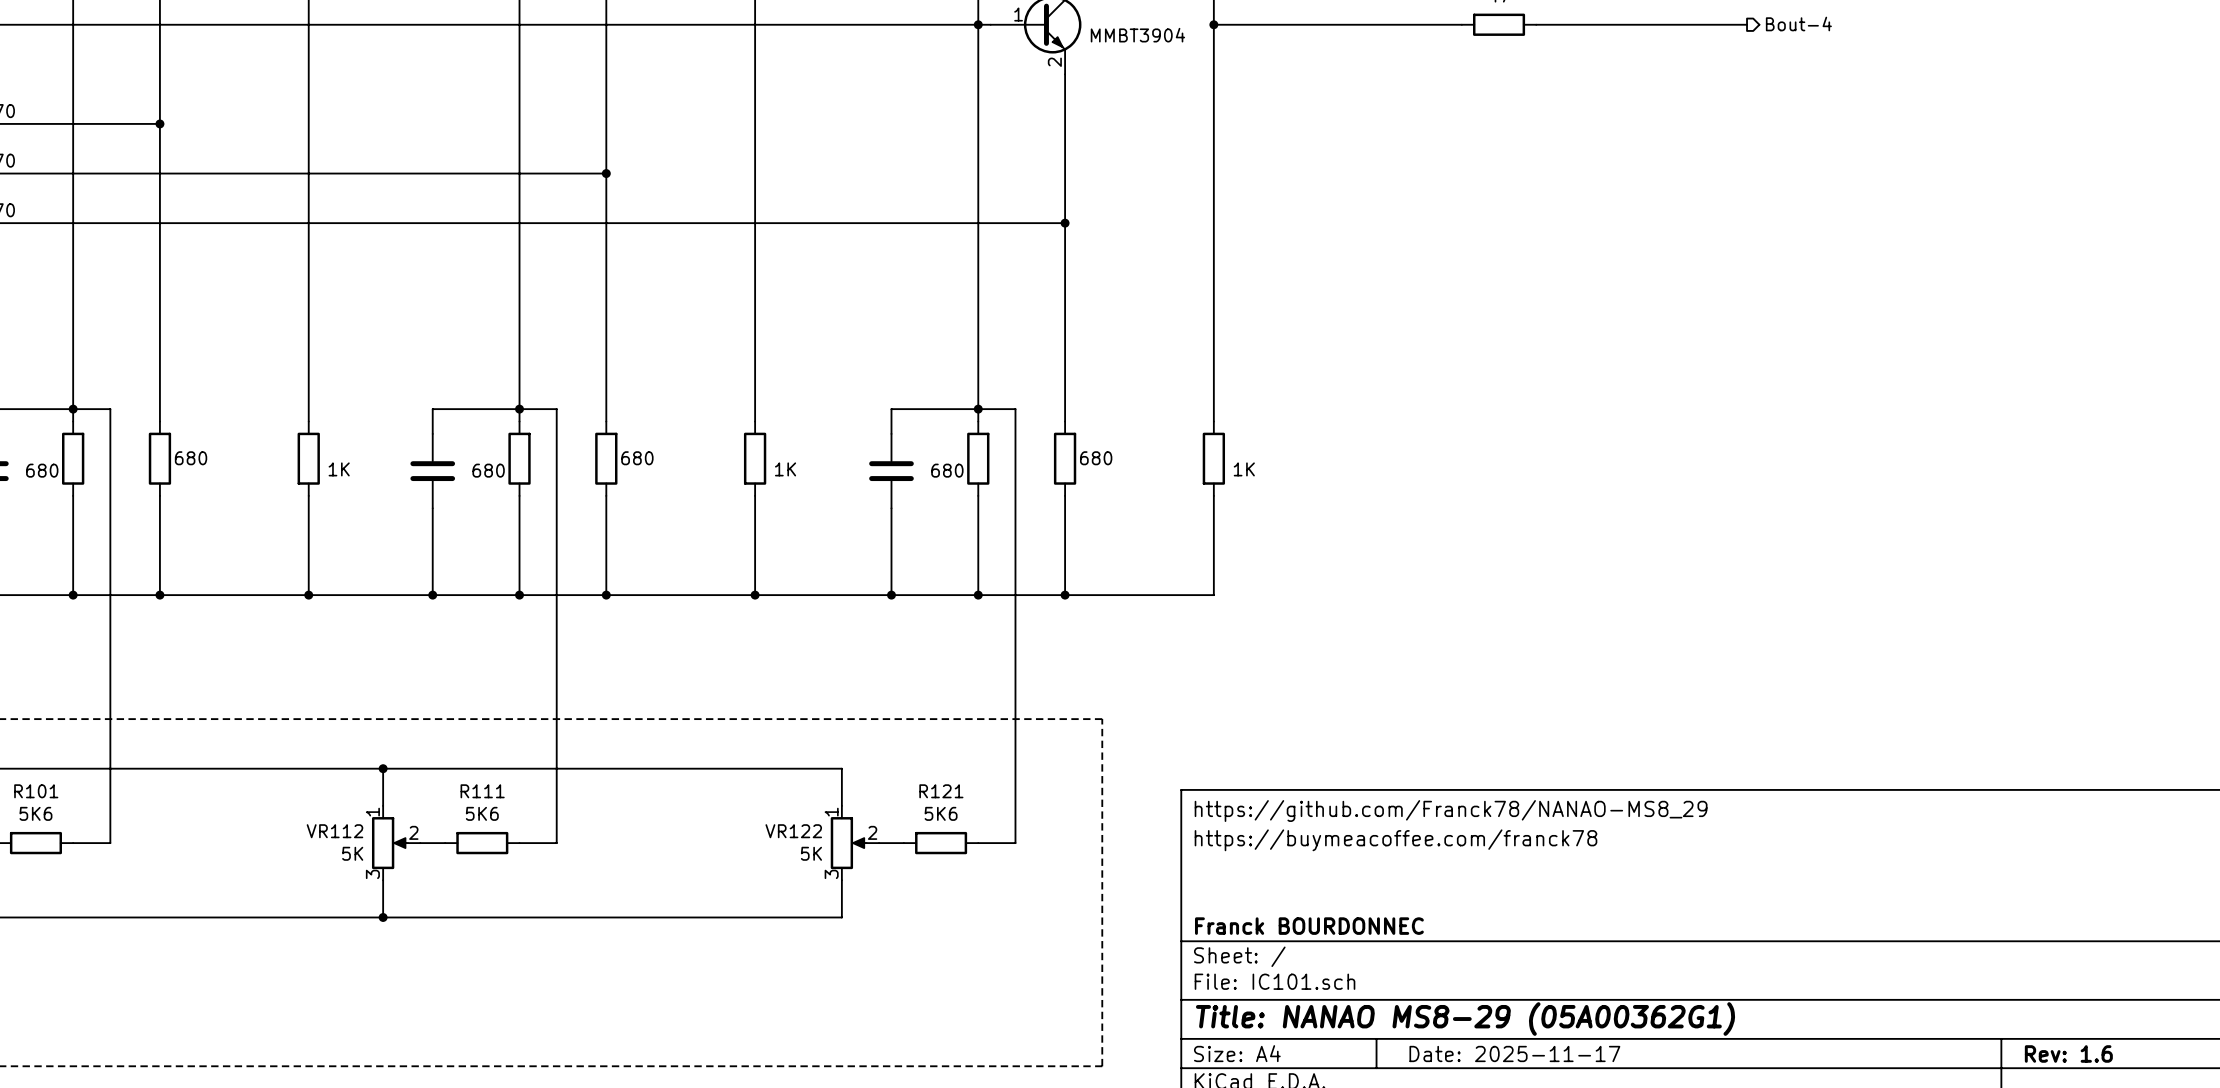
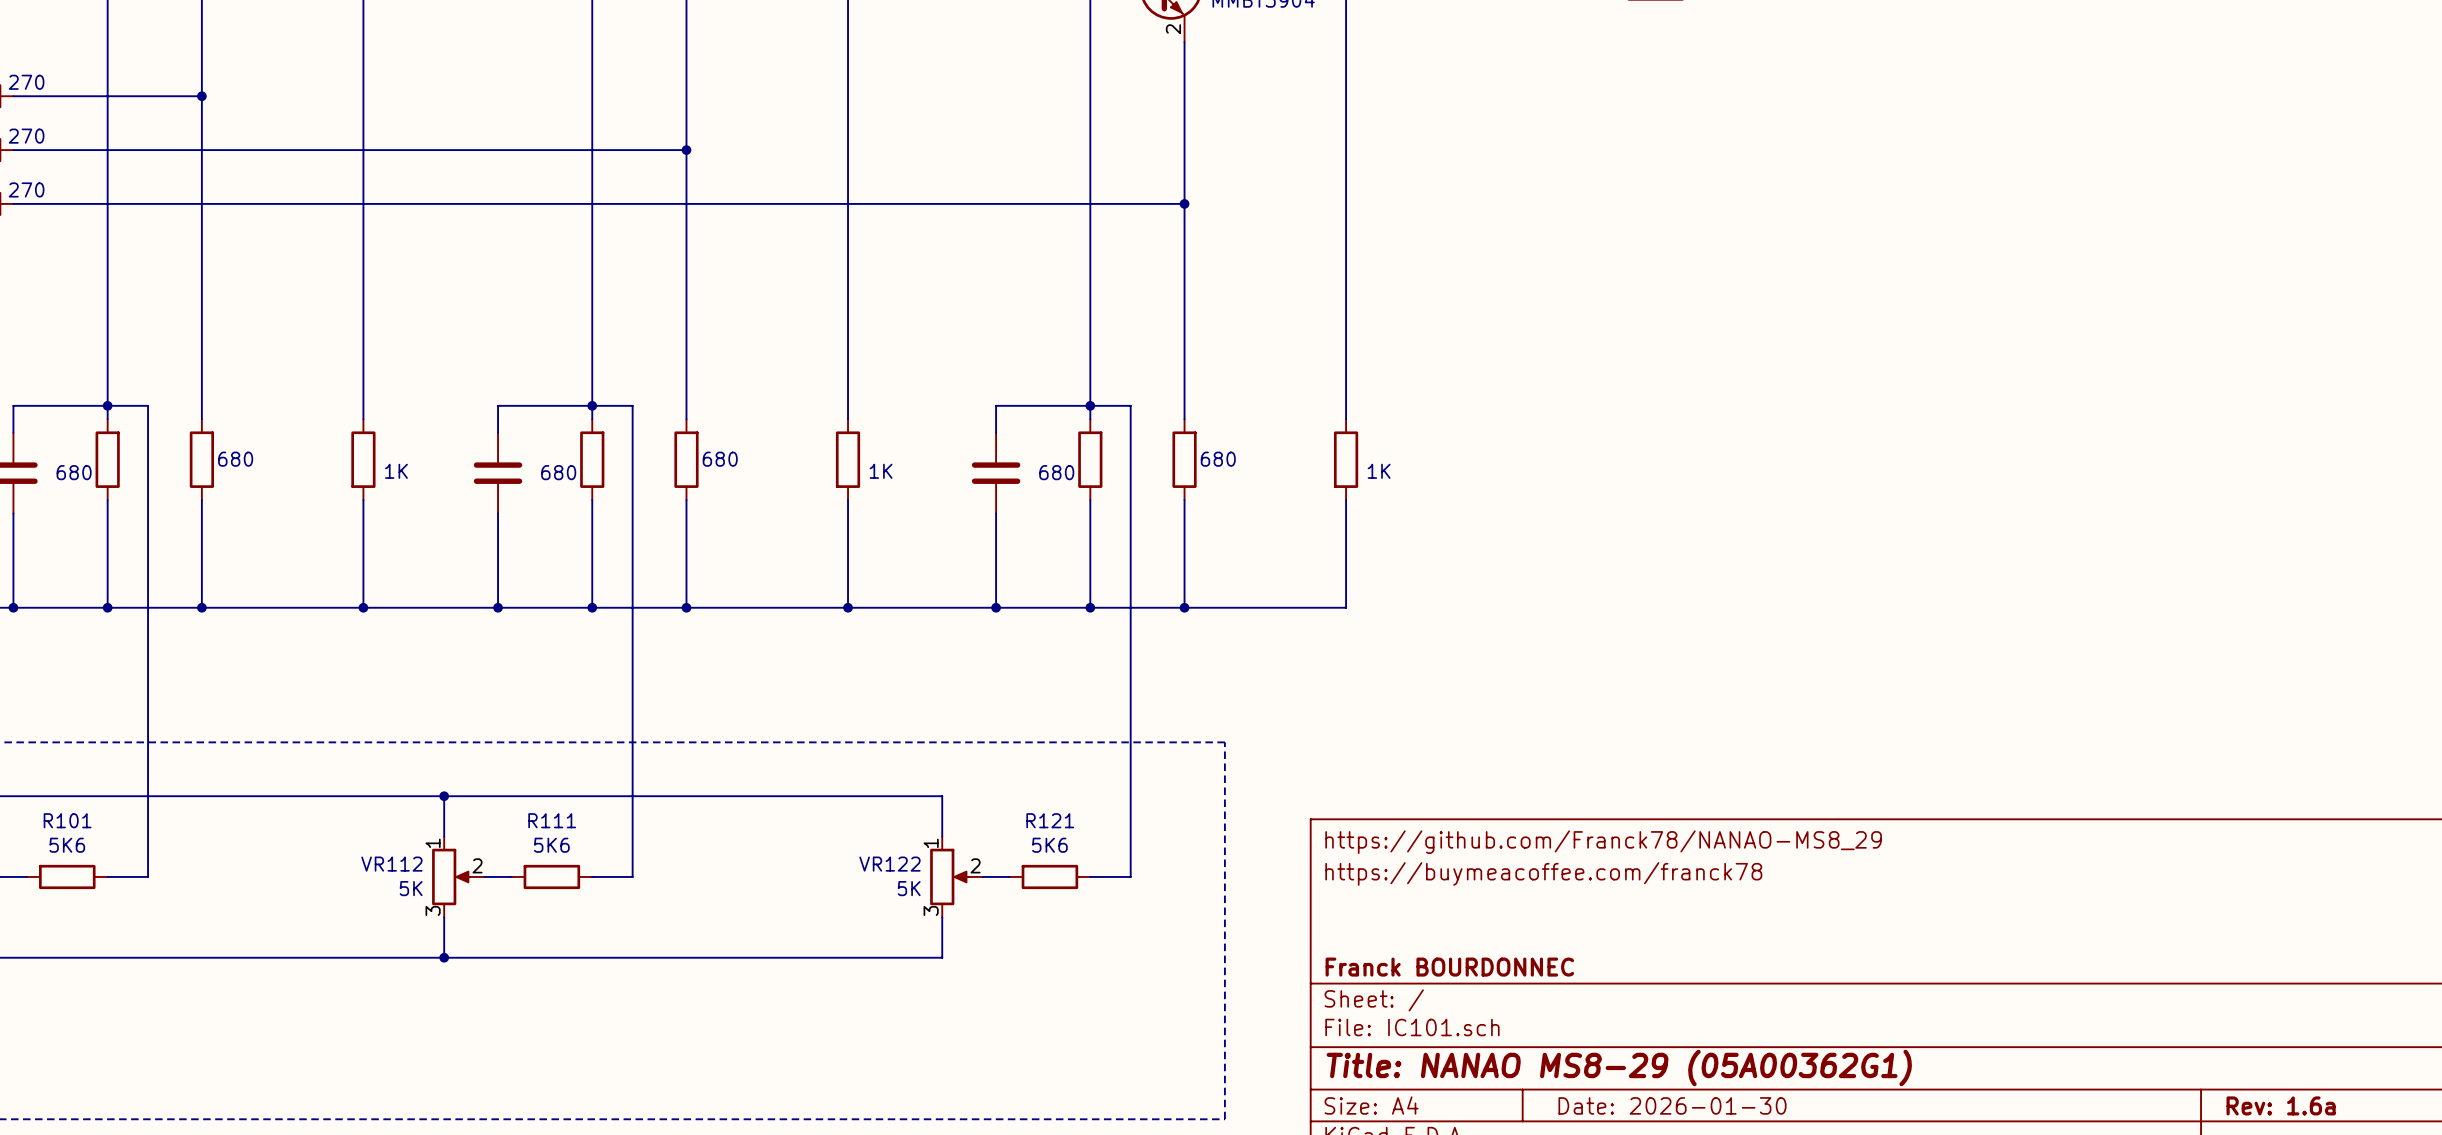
title block: Date: 2025-11-17 (1514, 1053) -> Date: 2026-01-30 (1672, 1105)
title block: Rev: 1.6 (2068, 1053) -> Rev: 1.6a (2281, 1105)

